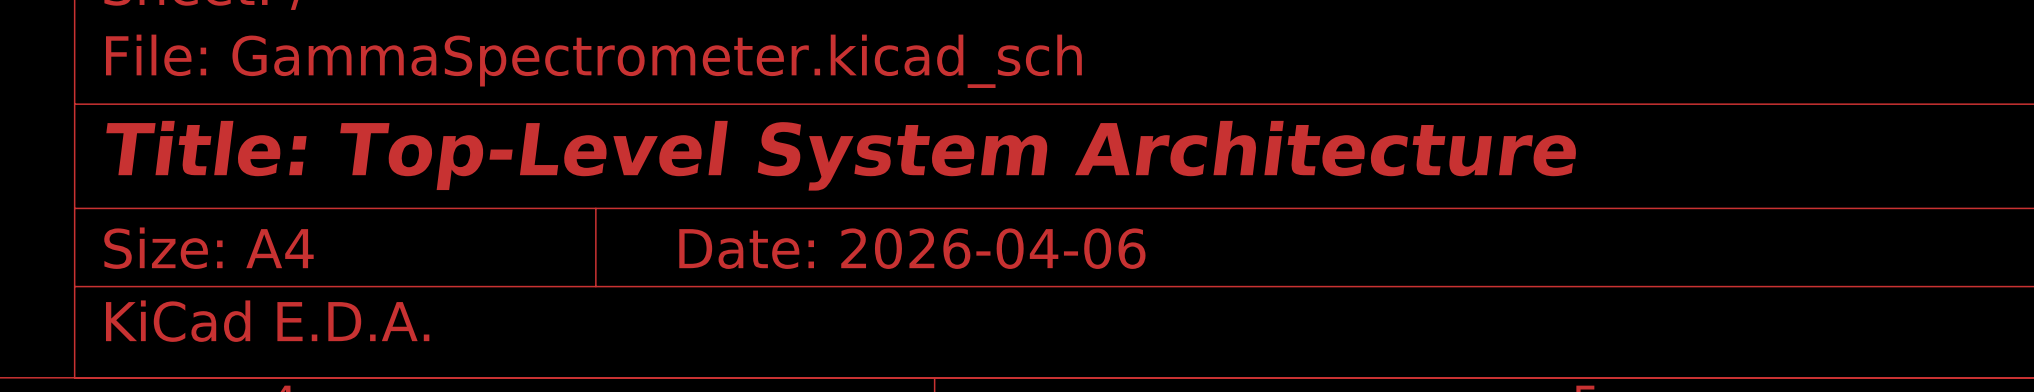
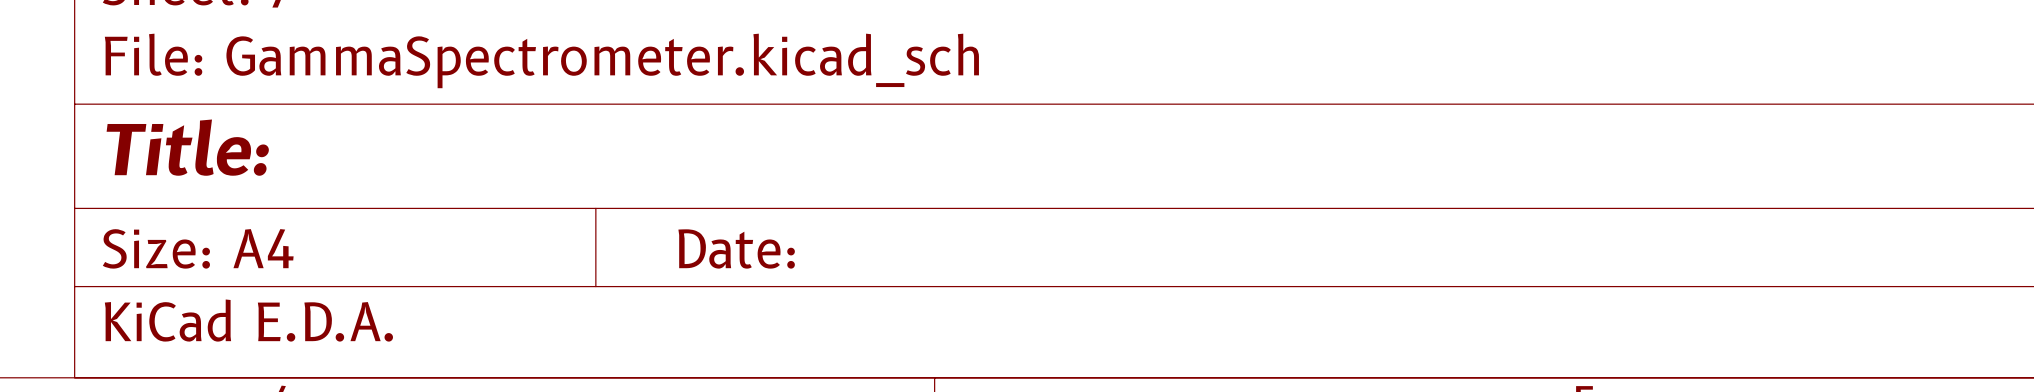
title block: Title: Top-Level System Architecture (841, 155) -> Title: (187, 147)
title block: Date: 2026-04-06 (912, 248) -> Date: (736, 248)

